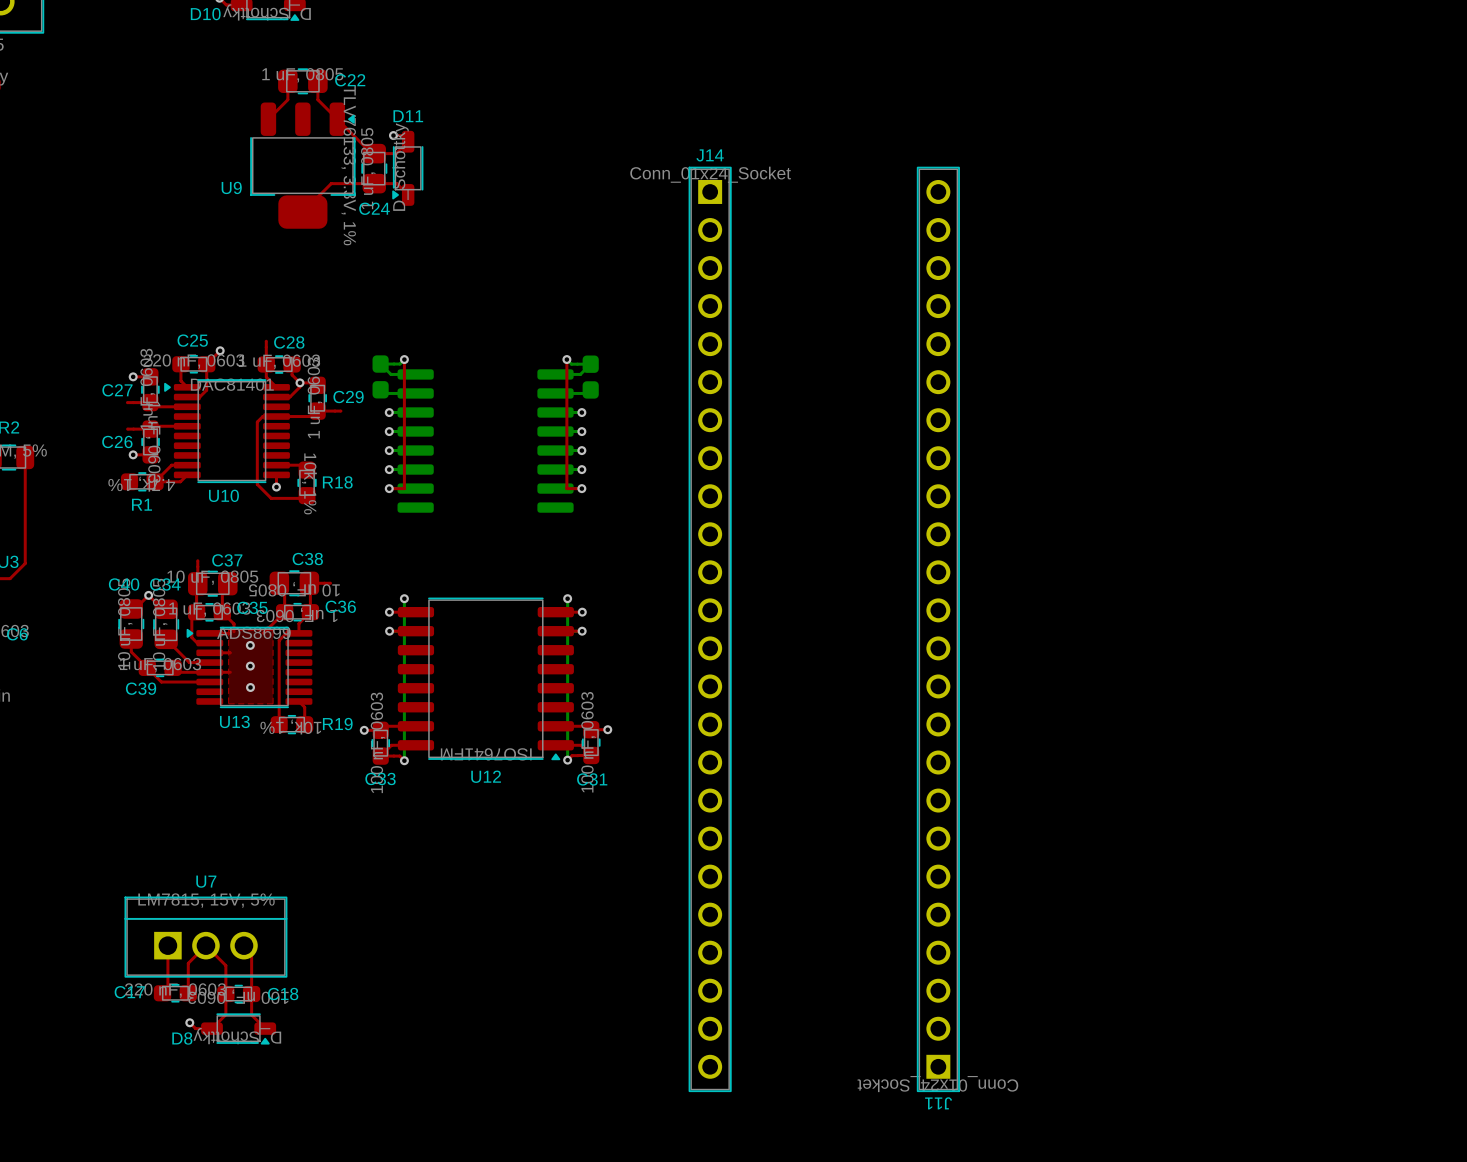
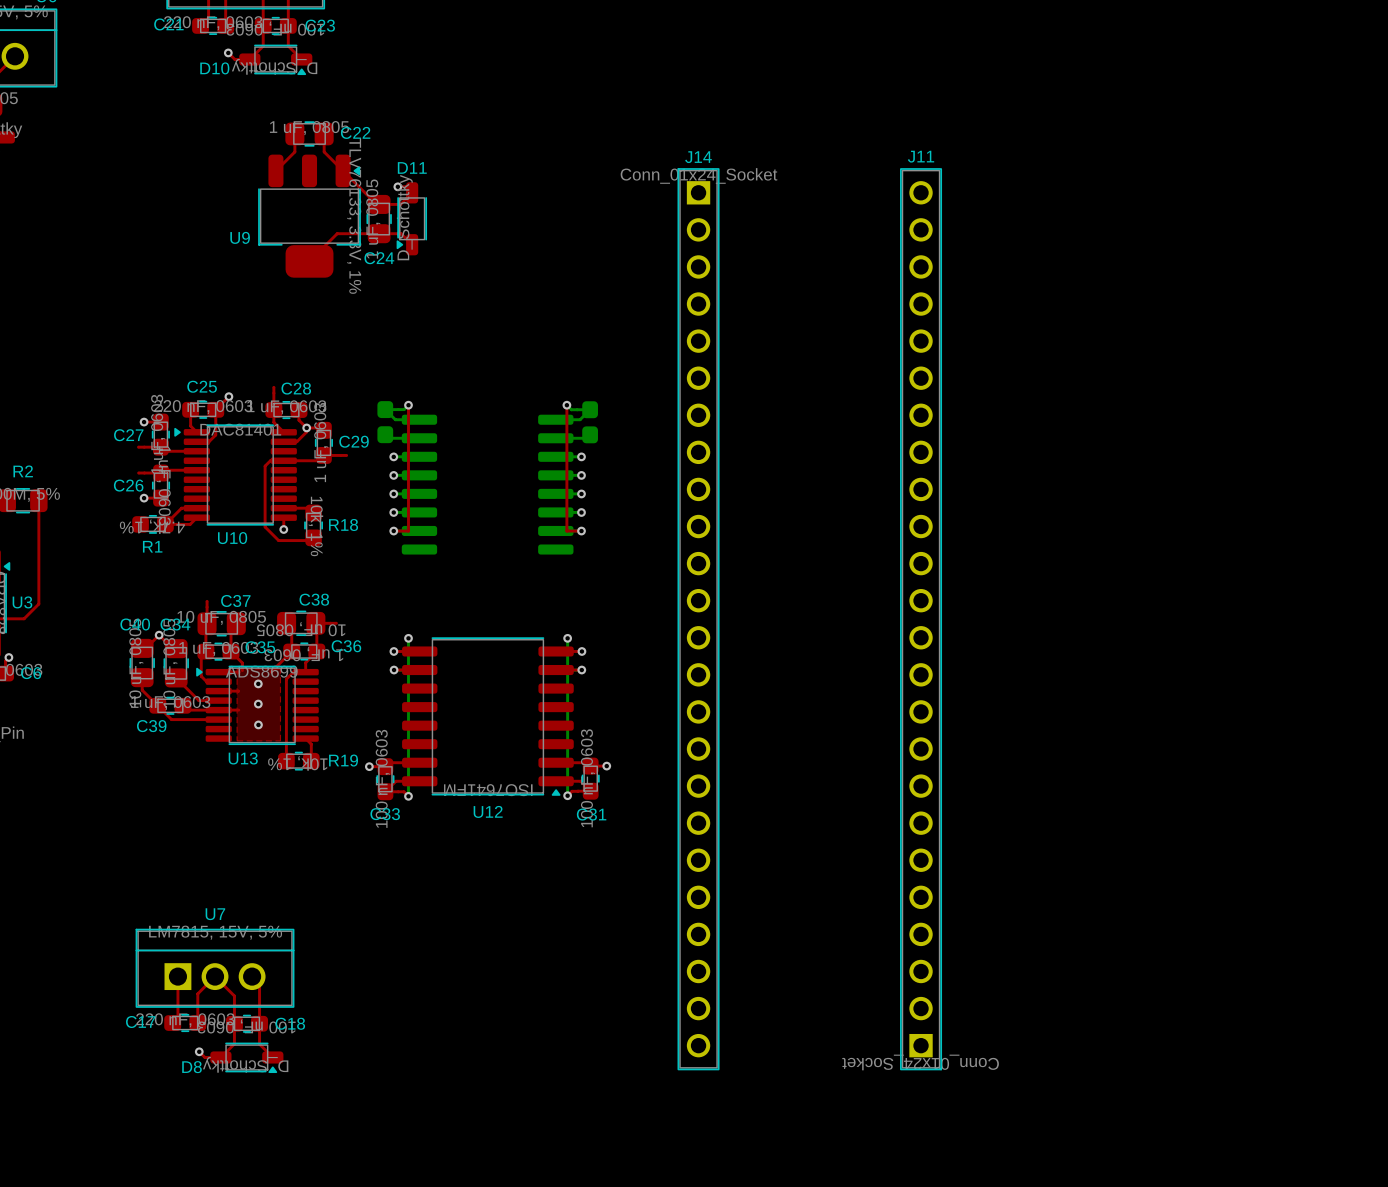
J14 position: (710, 629) -> (698, 619)
J11 position: (938, 629) -> (921, 619)
J11 name rotation: 0° (938, 1103) -> 180° (921, 156)
J11 name position: J11 (938, 1103) -> J11 (921, 156)

